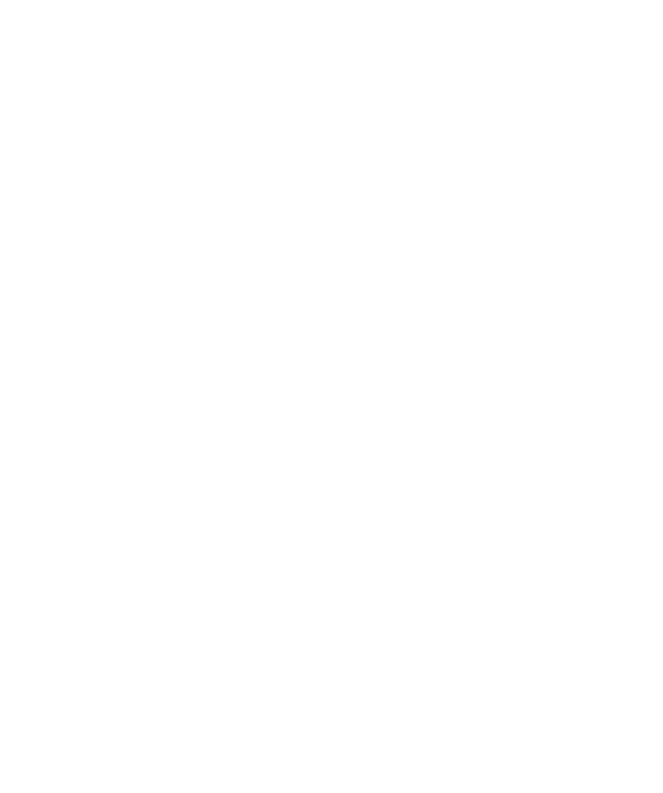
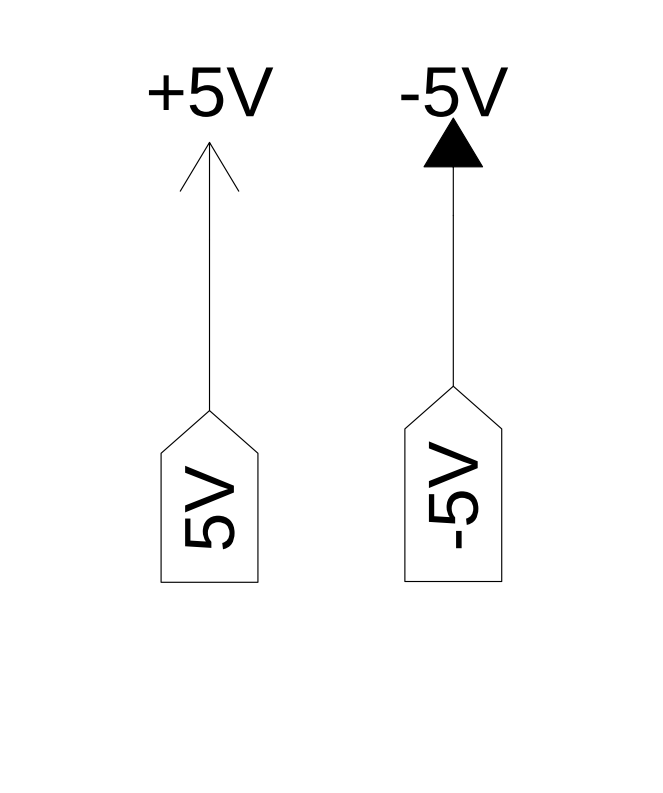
power symbol: none -> -5V (453, 166)
power symbol: none -> +5V (209, 191)
wire: none -> (453, 215) (453, 386)
wire: none -> (209, 239) (209, 410)
global label: none -> 5V (209, 507)
global label: none -> -5V (453, 494)

